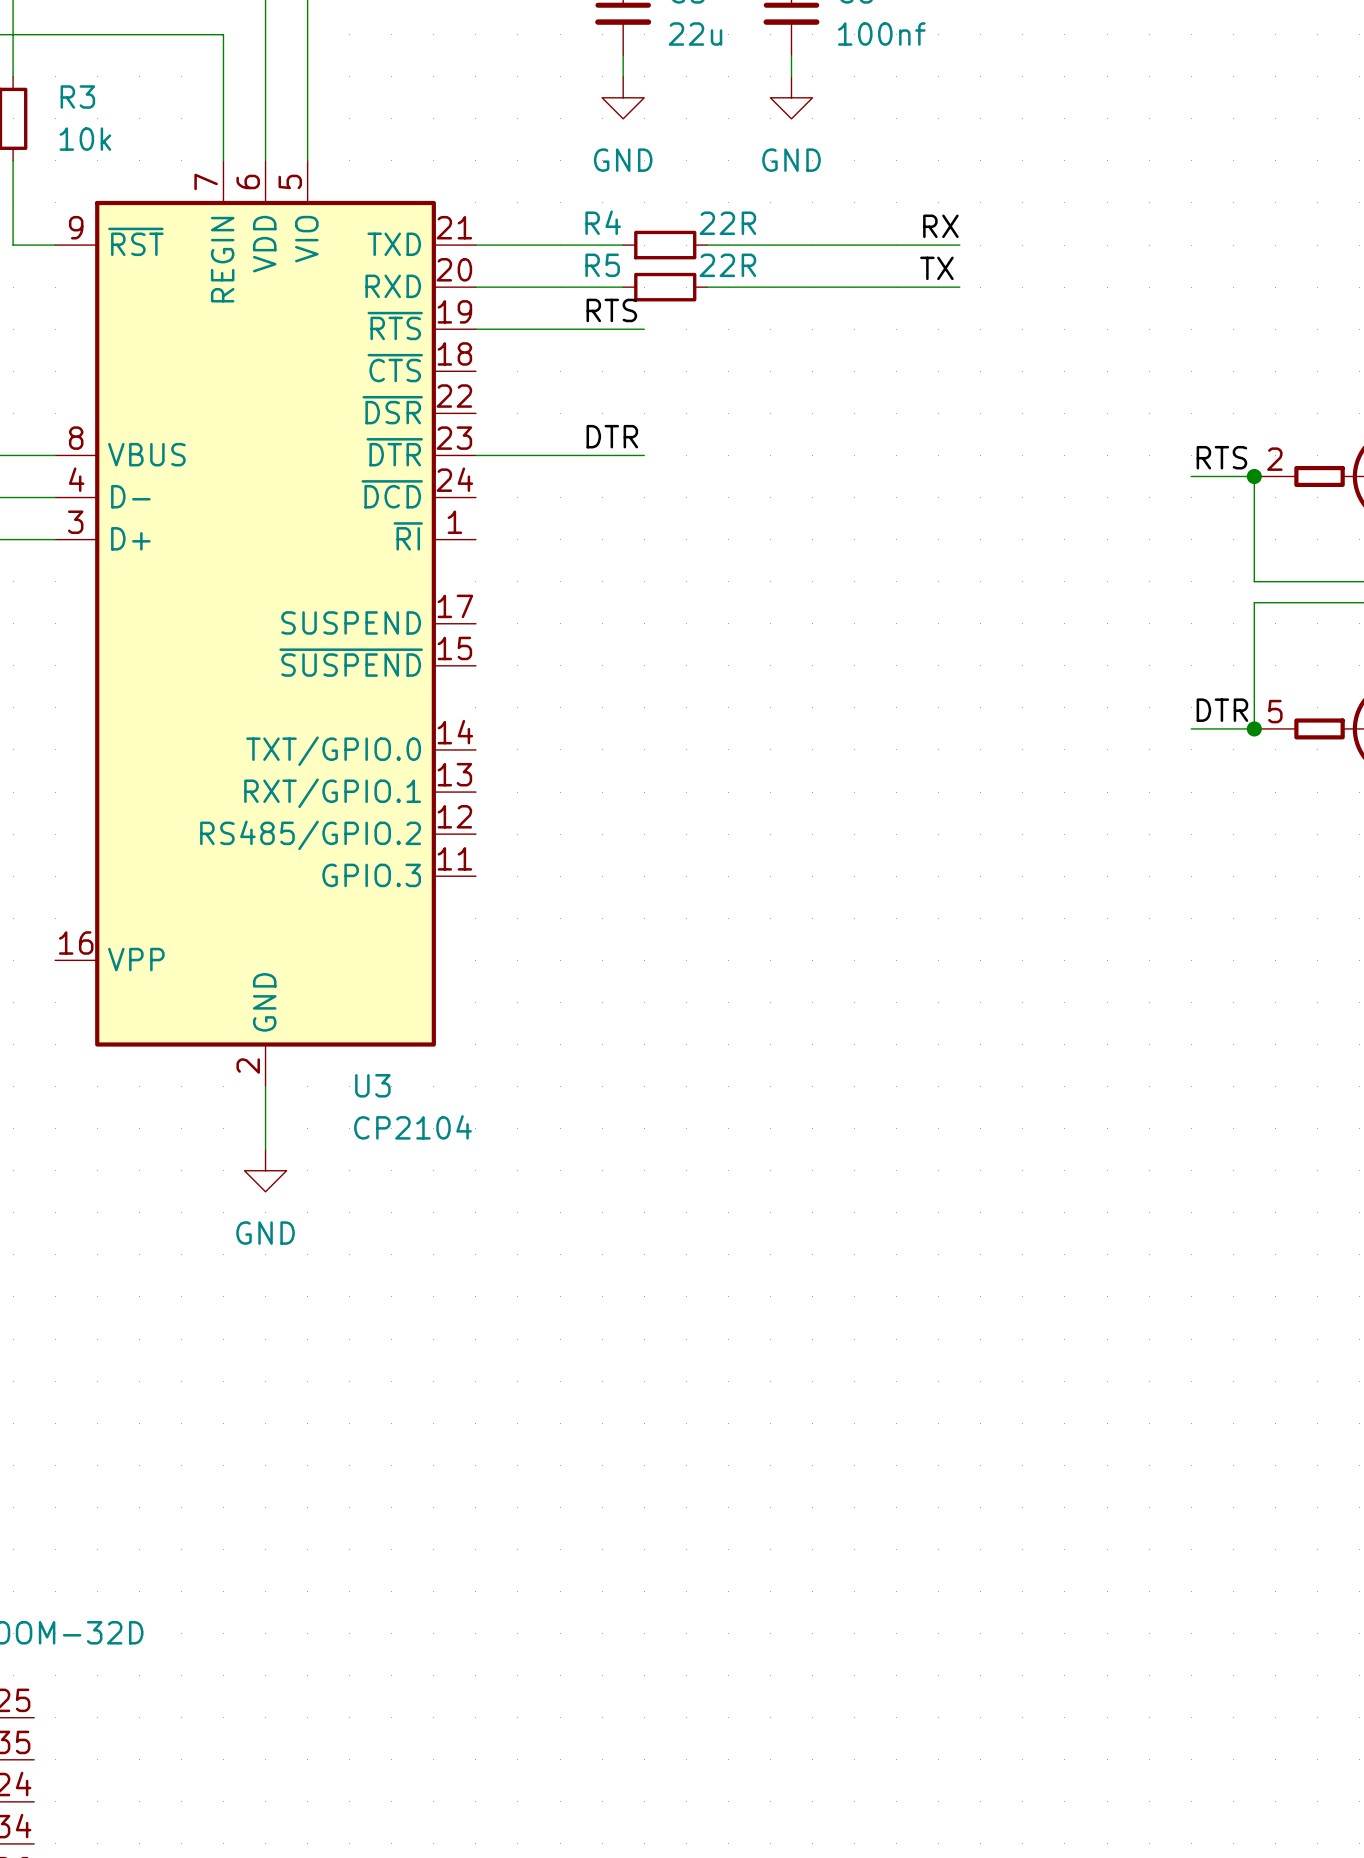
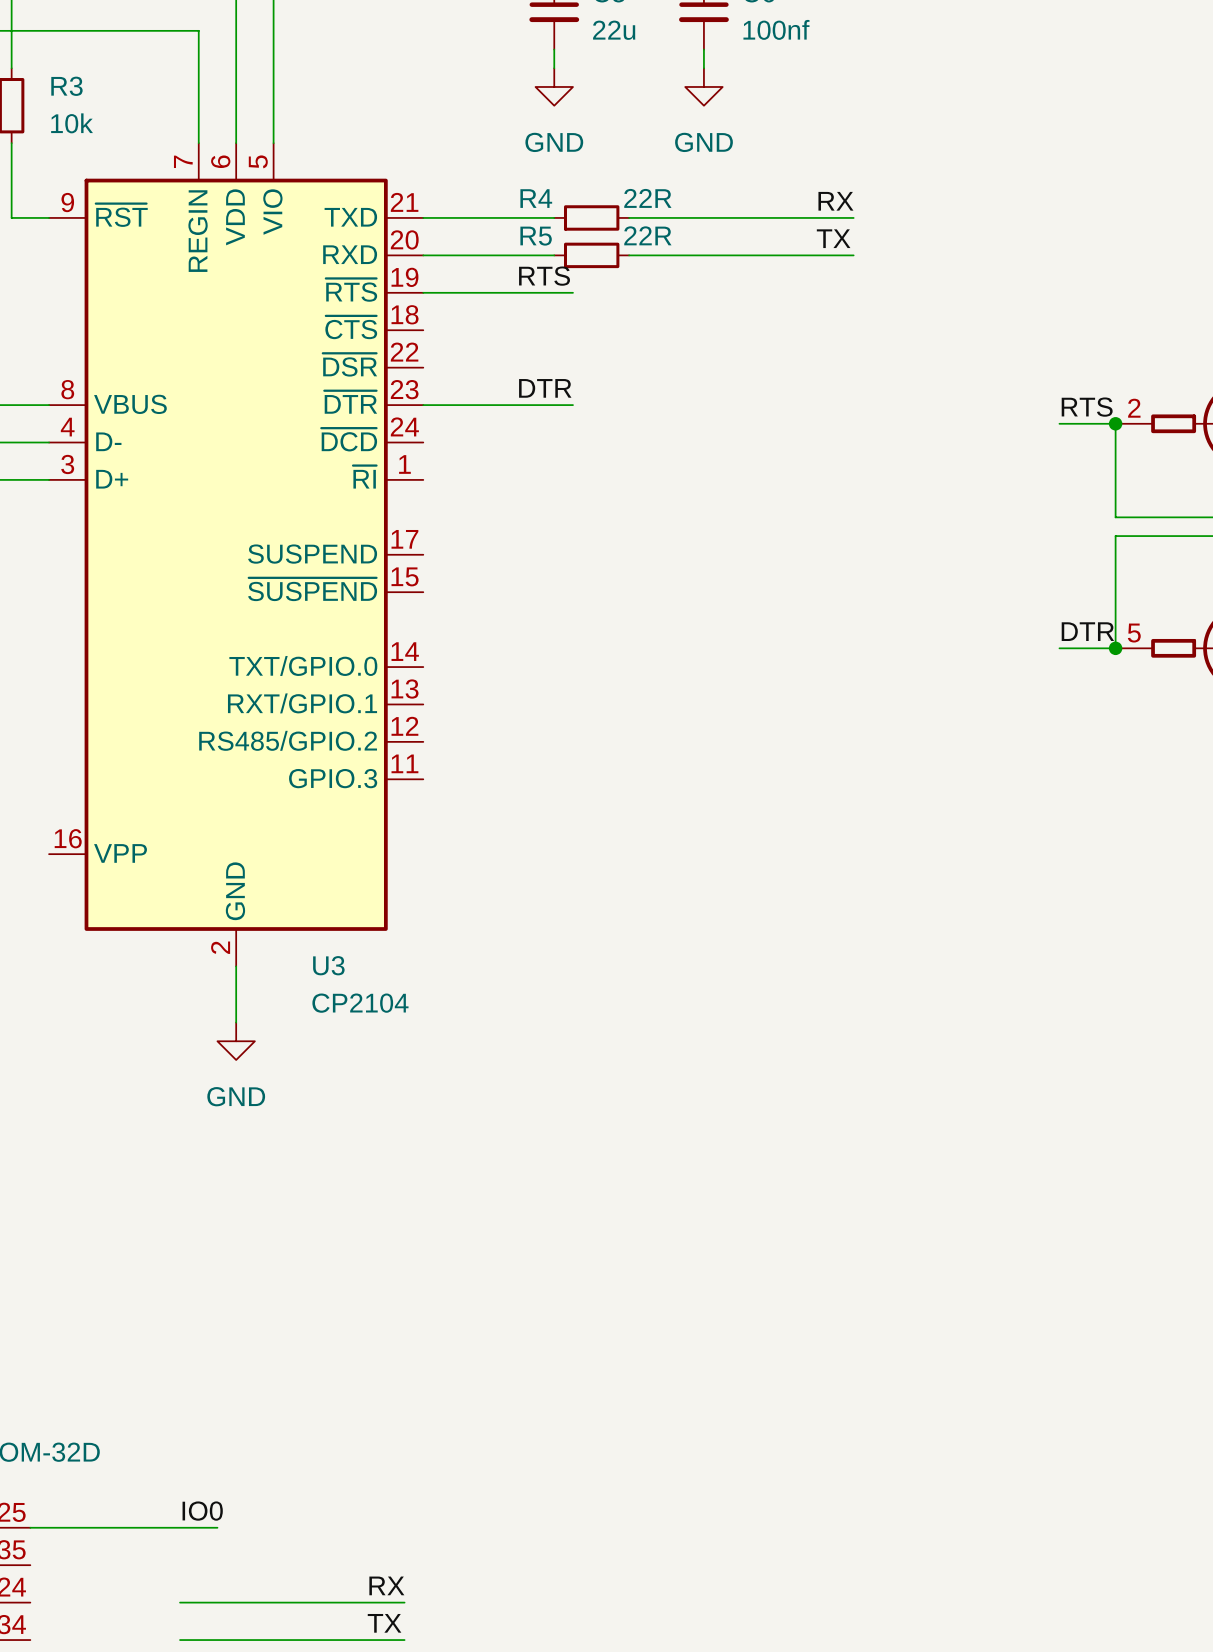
label: none -> IO0 (202, 1511)
wire: none -> (30, 1527) (217, 1527)
label: none -> RX (386, 1585)
wire: none -> (180, 1602) (404, 1602)
label: none -> TX (384, 1623)
wire: none -> (180, 1640) (404, 1640)

